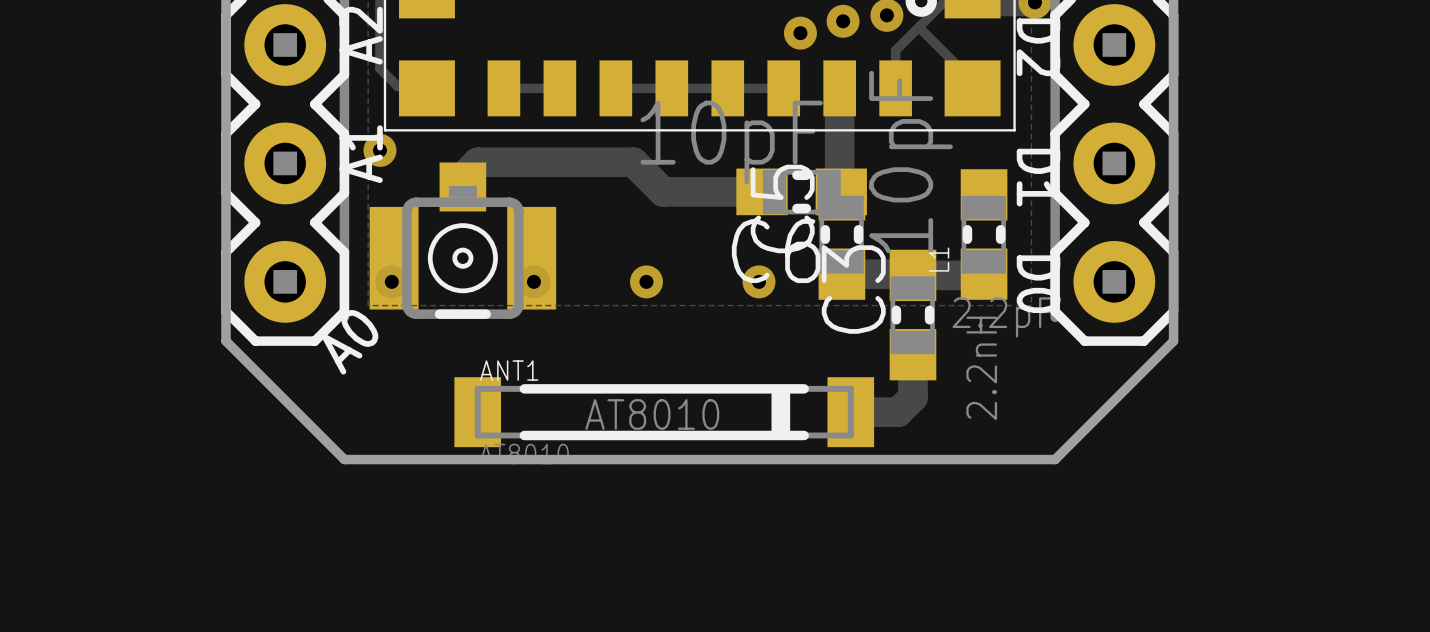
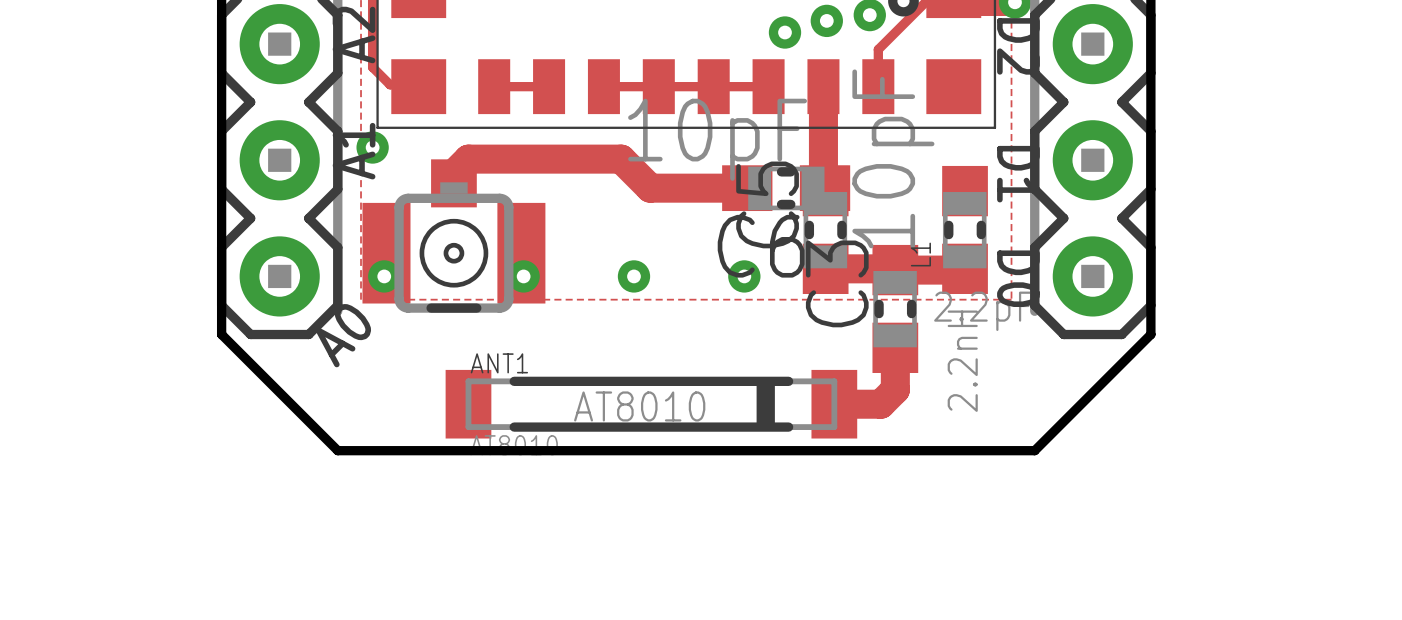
track: (918, 27) (972, 80) -> none

